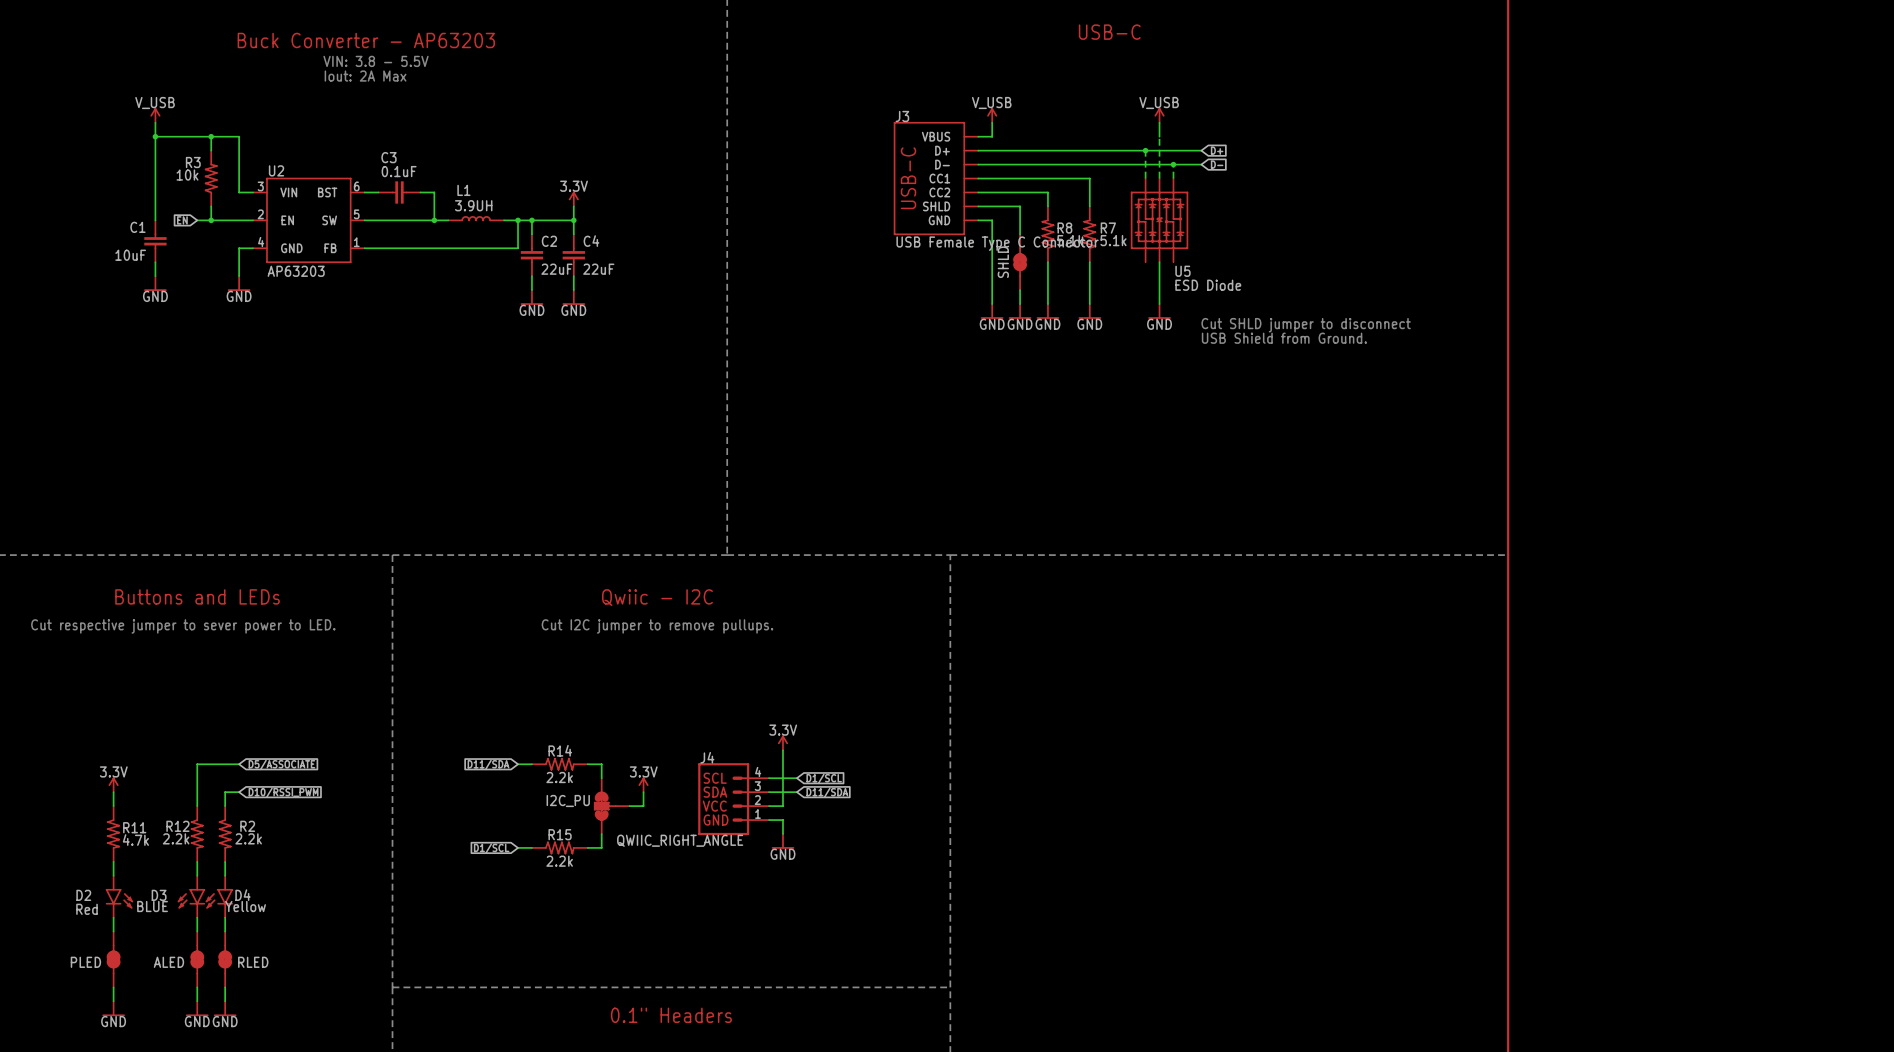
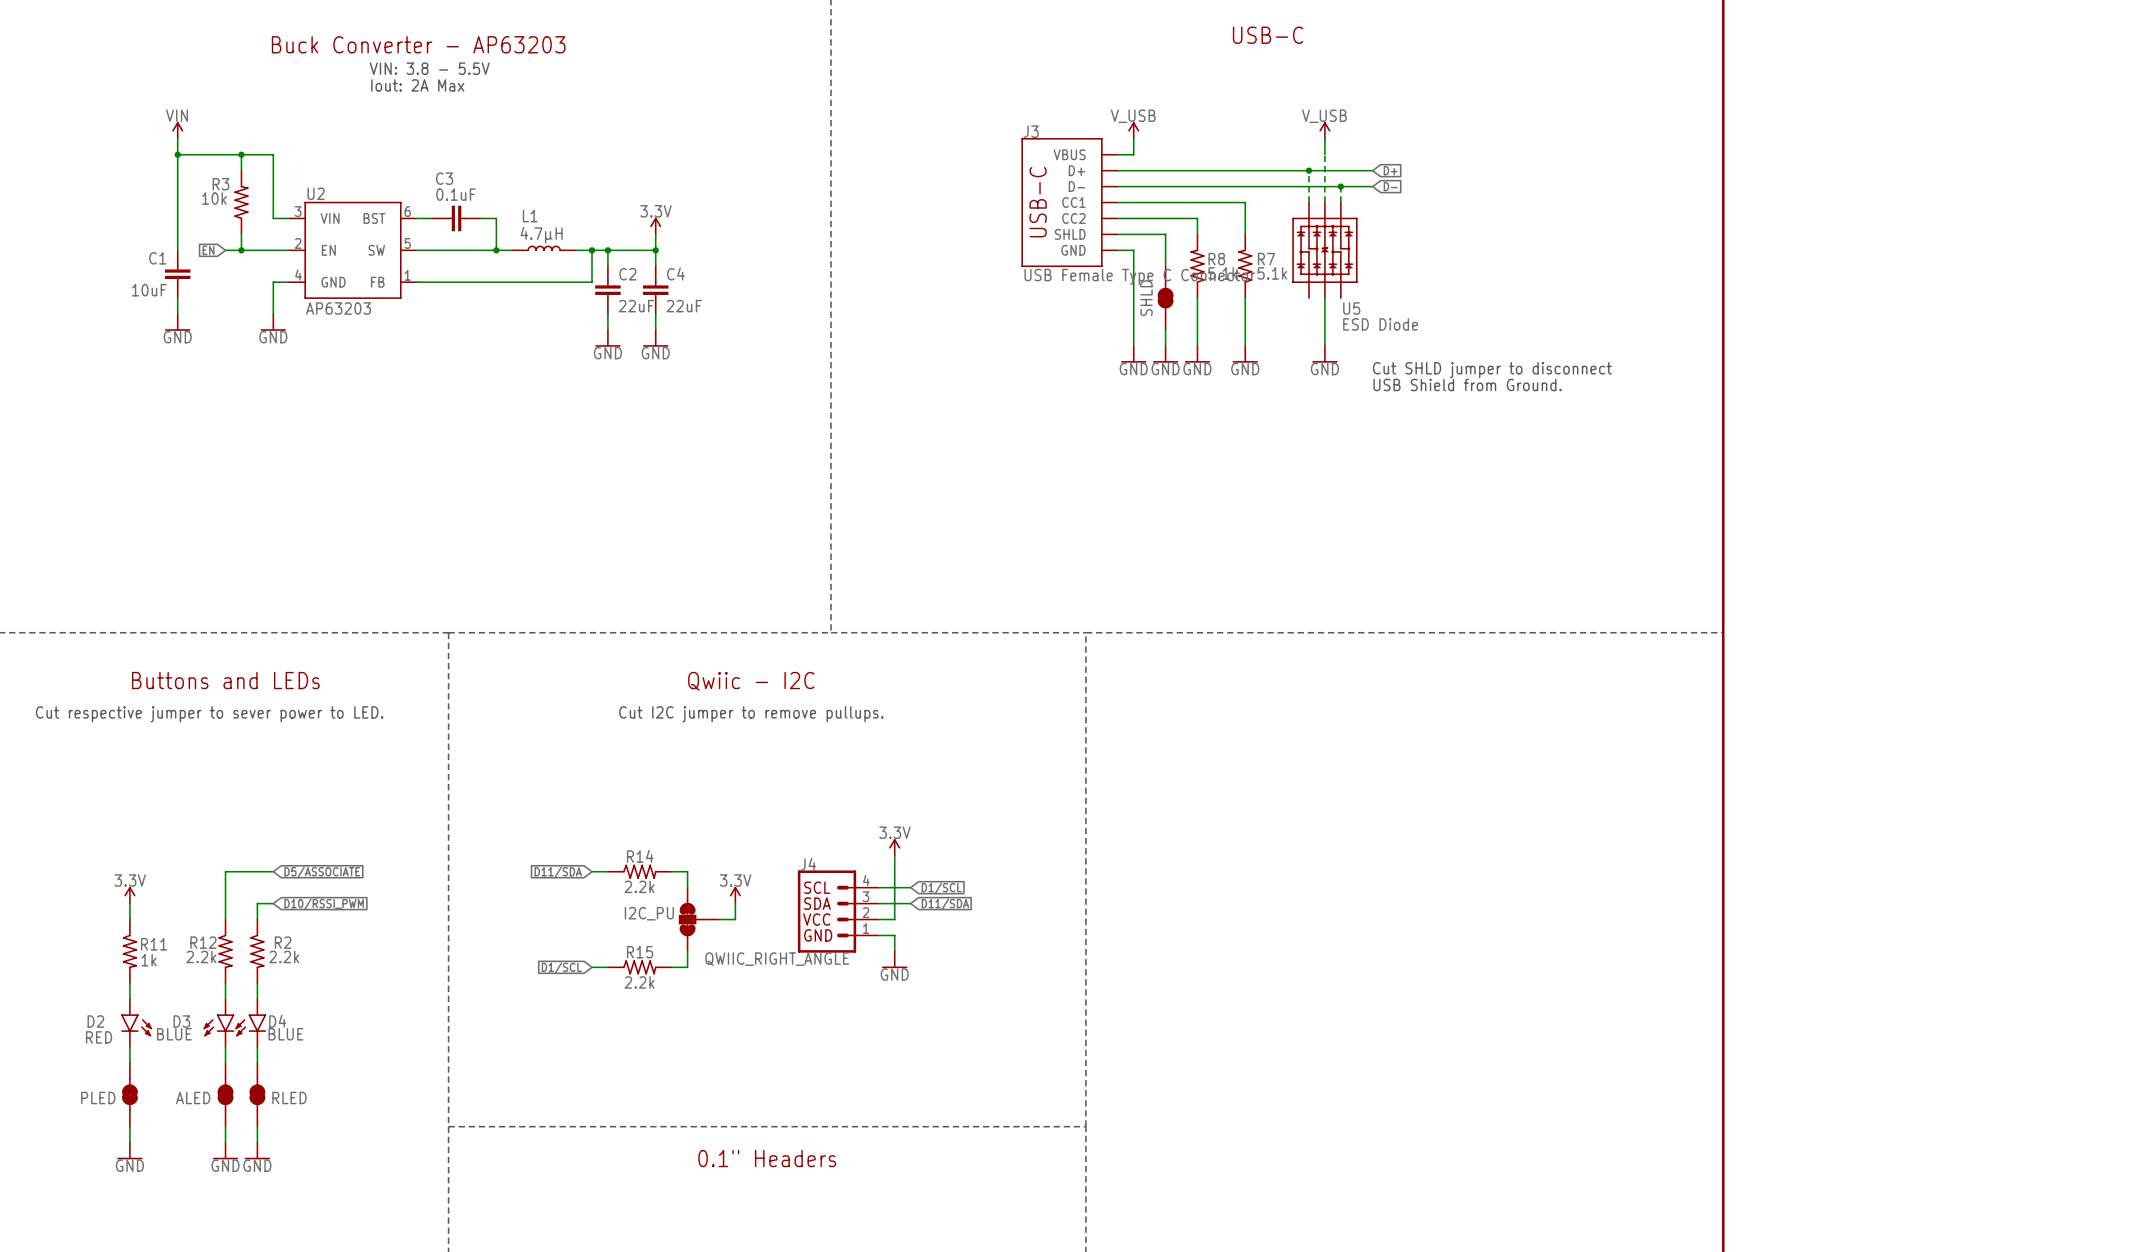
power symbol: V_USB (155, 115) -> VIN (177, 130)
L1 value: 3.9UH (473, 205) -> 4.7μH (541, 235)
R11 value: 4.7k (135, 840) -> 1k (149, 960)
D4 value: Yellow (245, 906) -> BLUE (285, 1034)
D2 value: Red (87, 909) -> RED (99, 1037)

